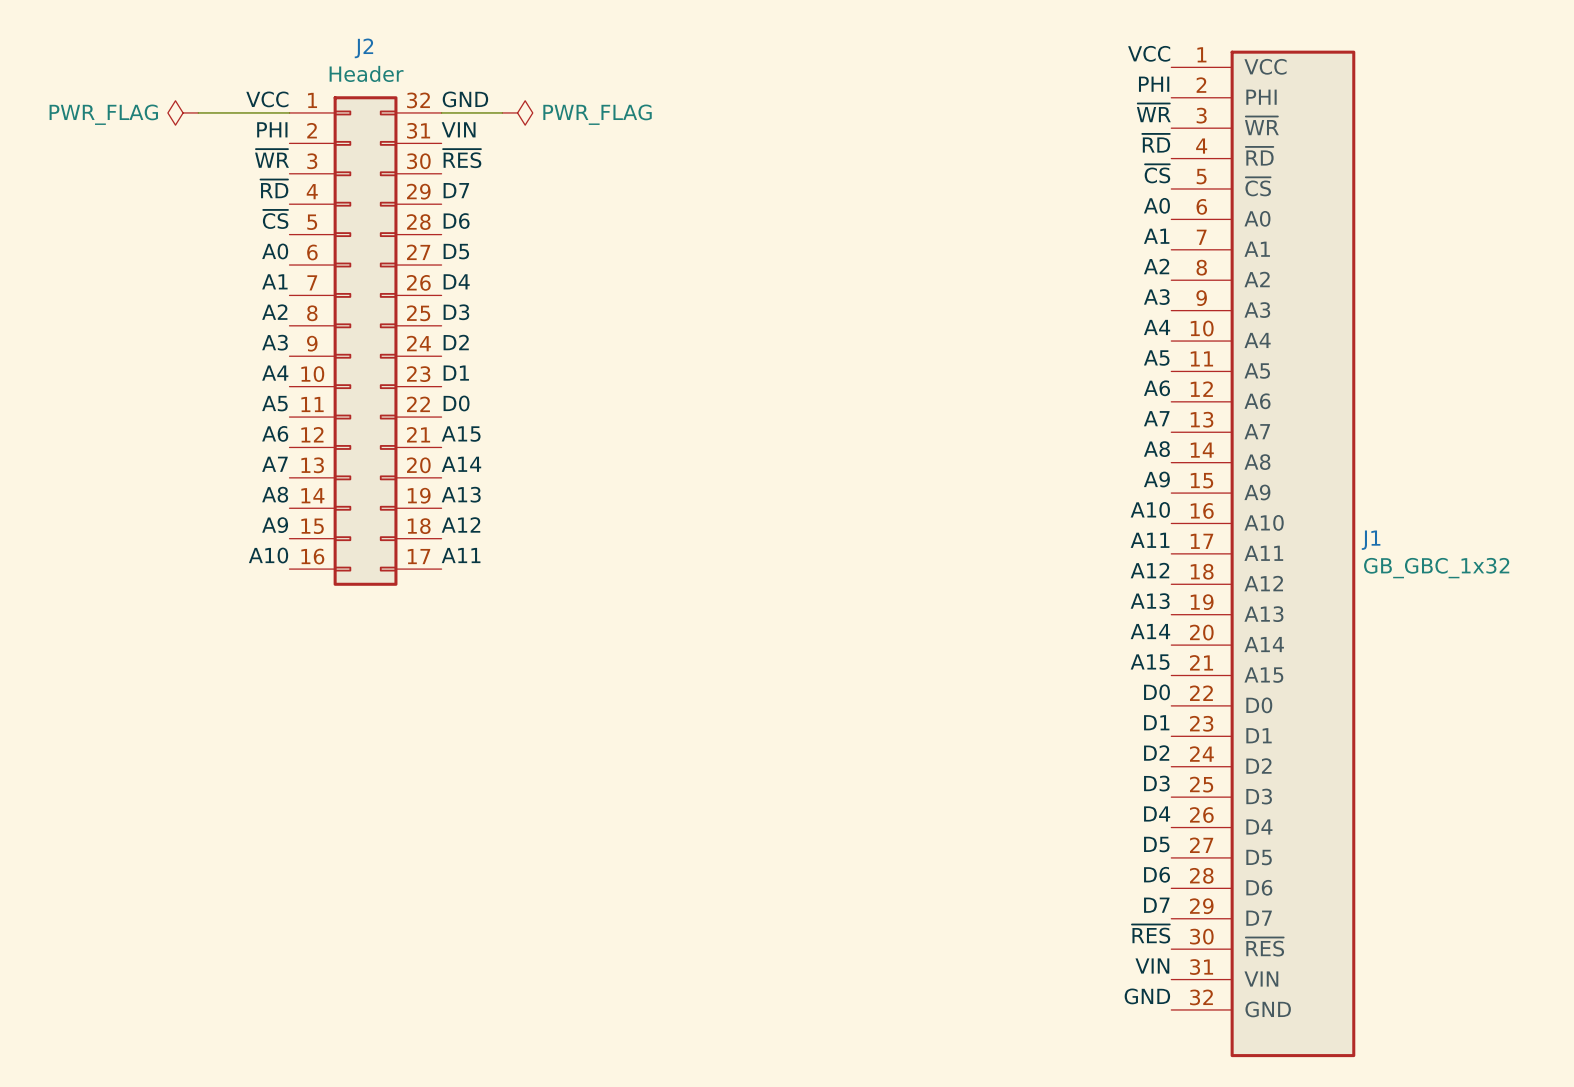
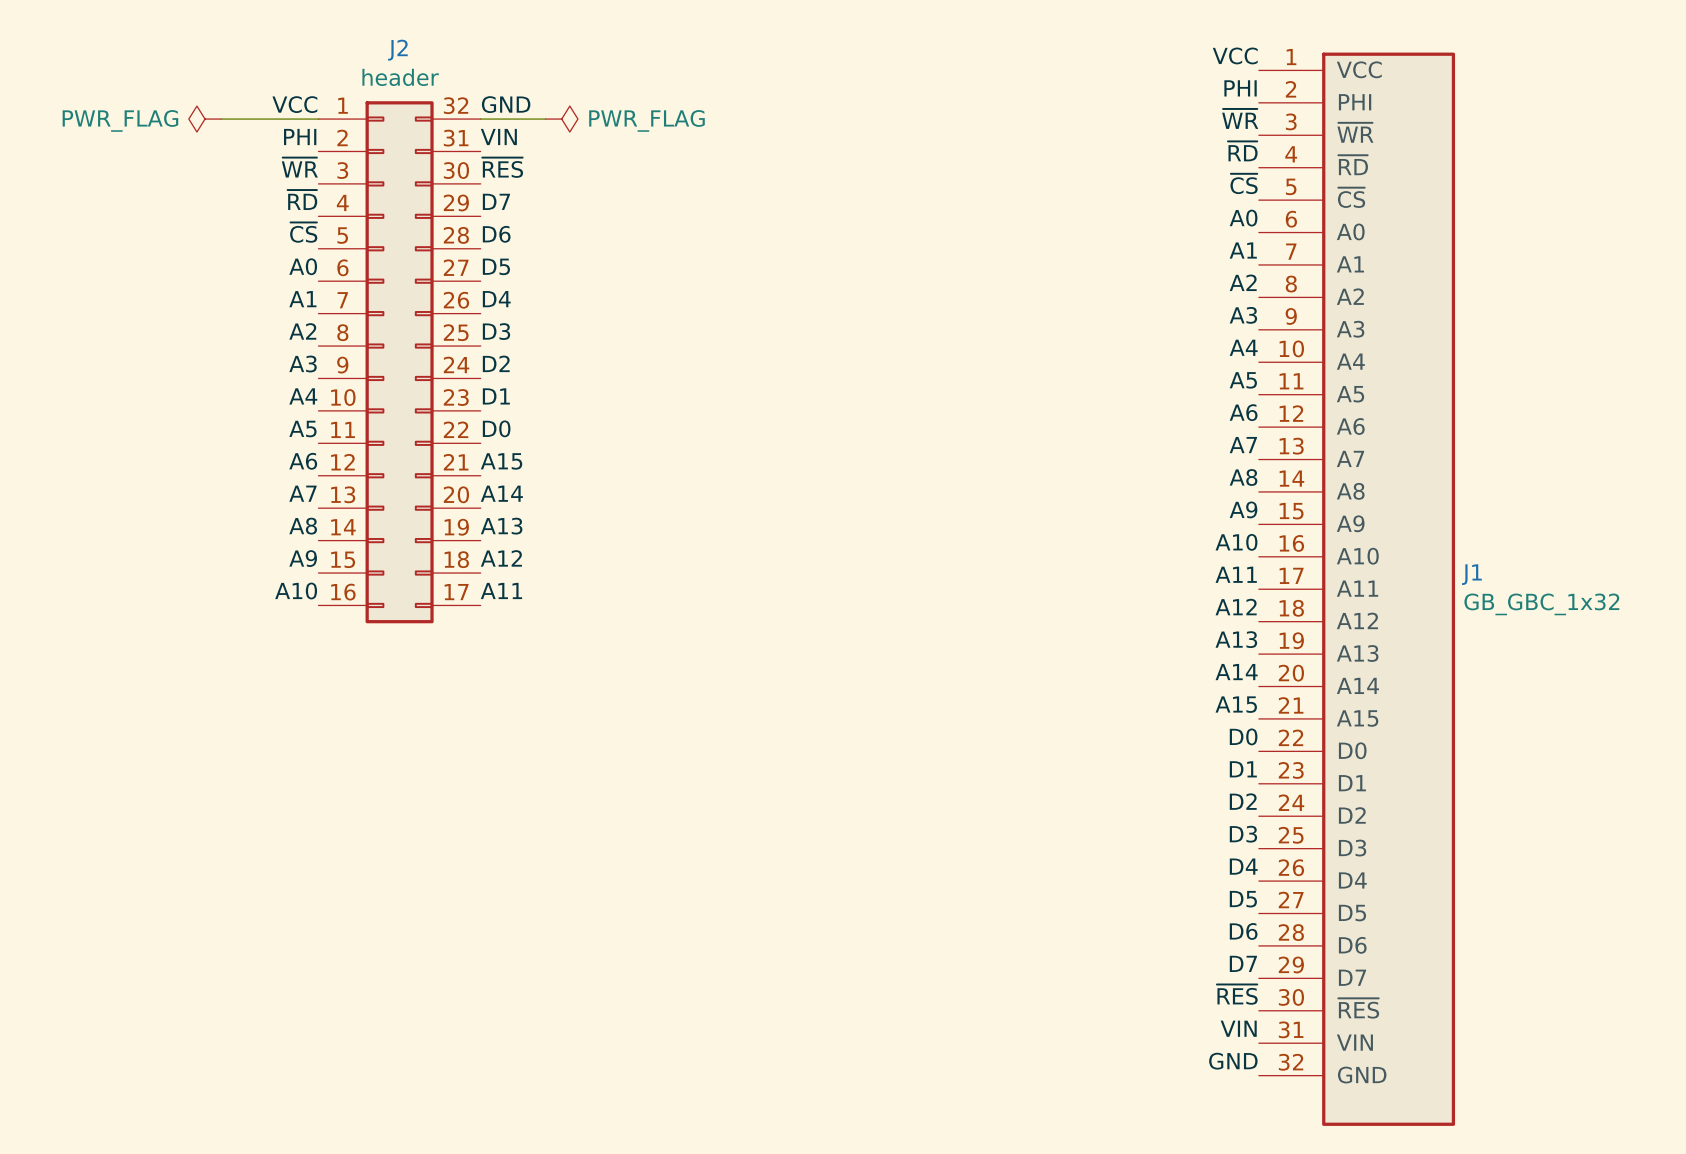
J2 value: Header (366, 73) -> header (400, 77)

